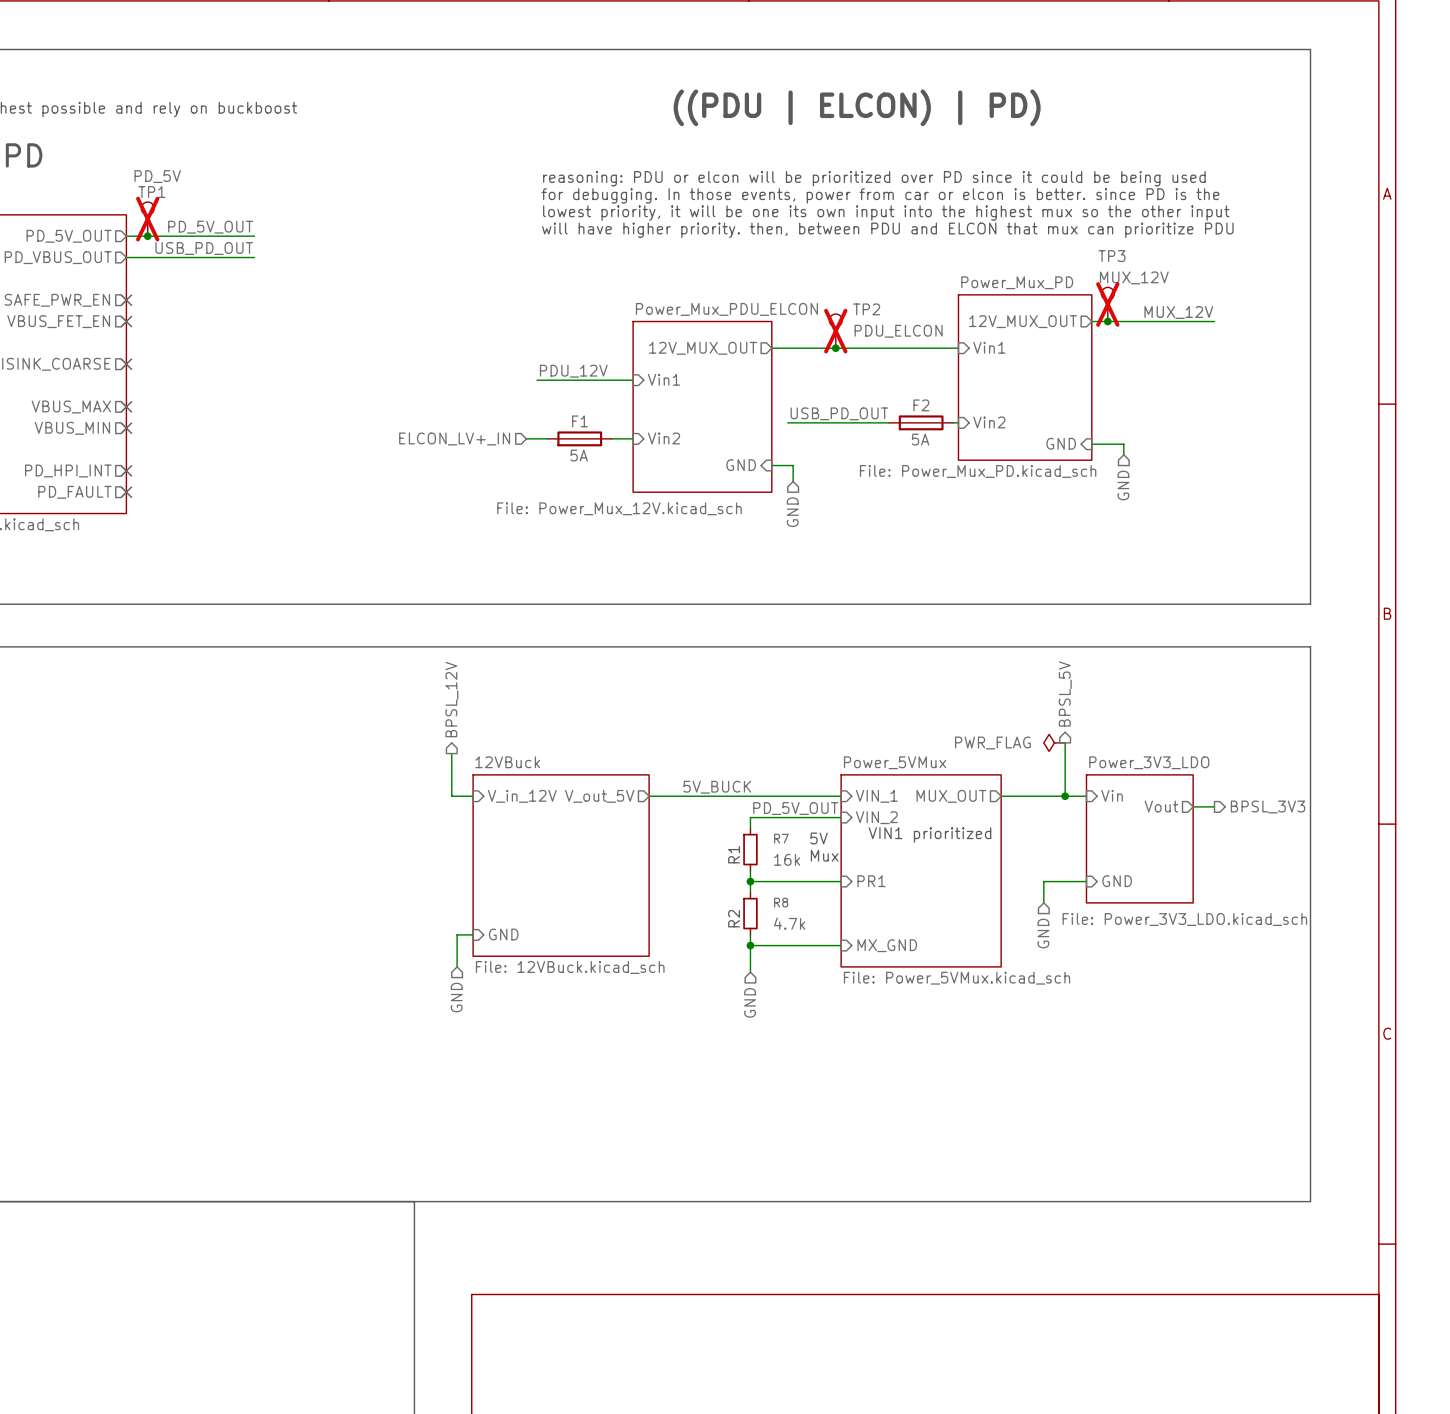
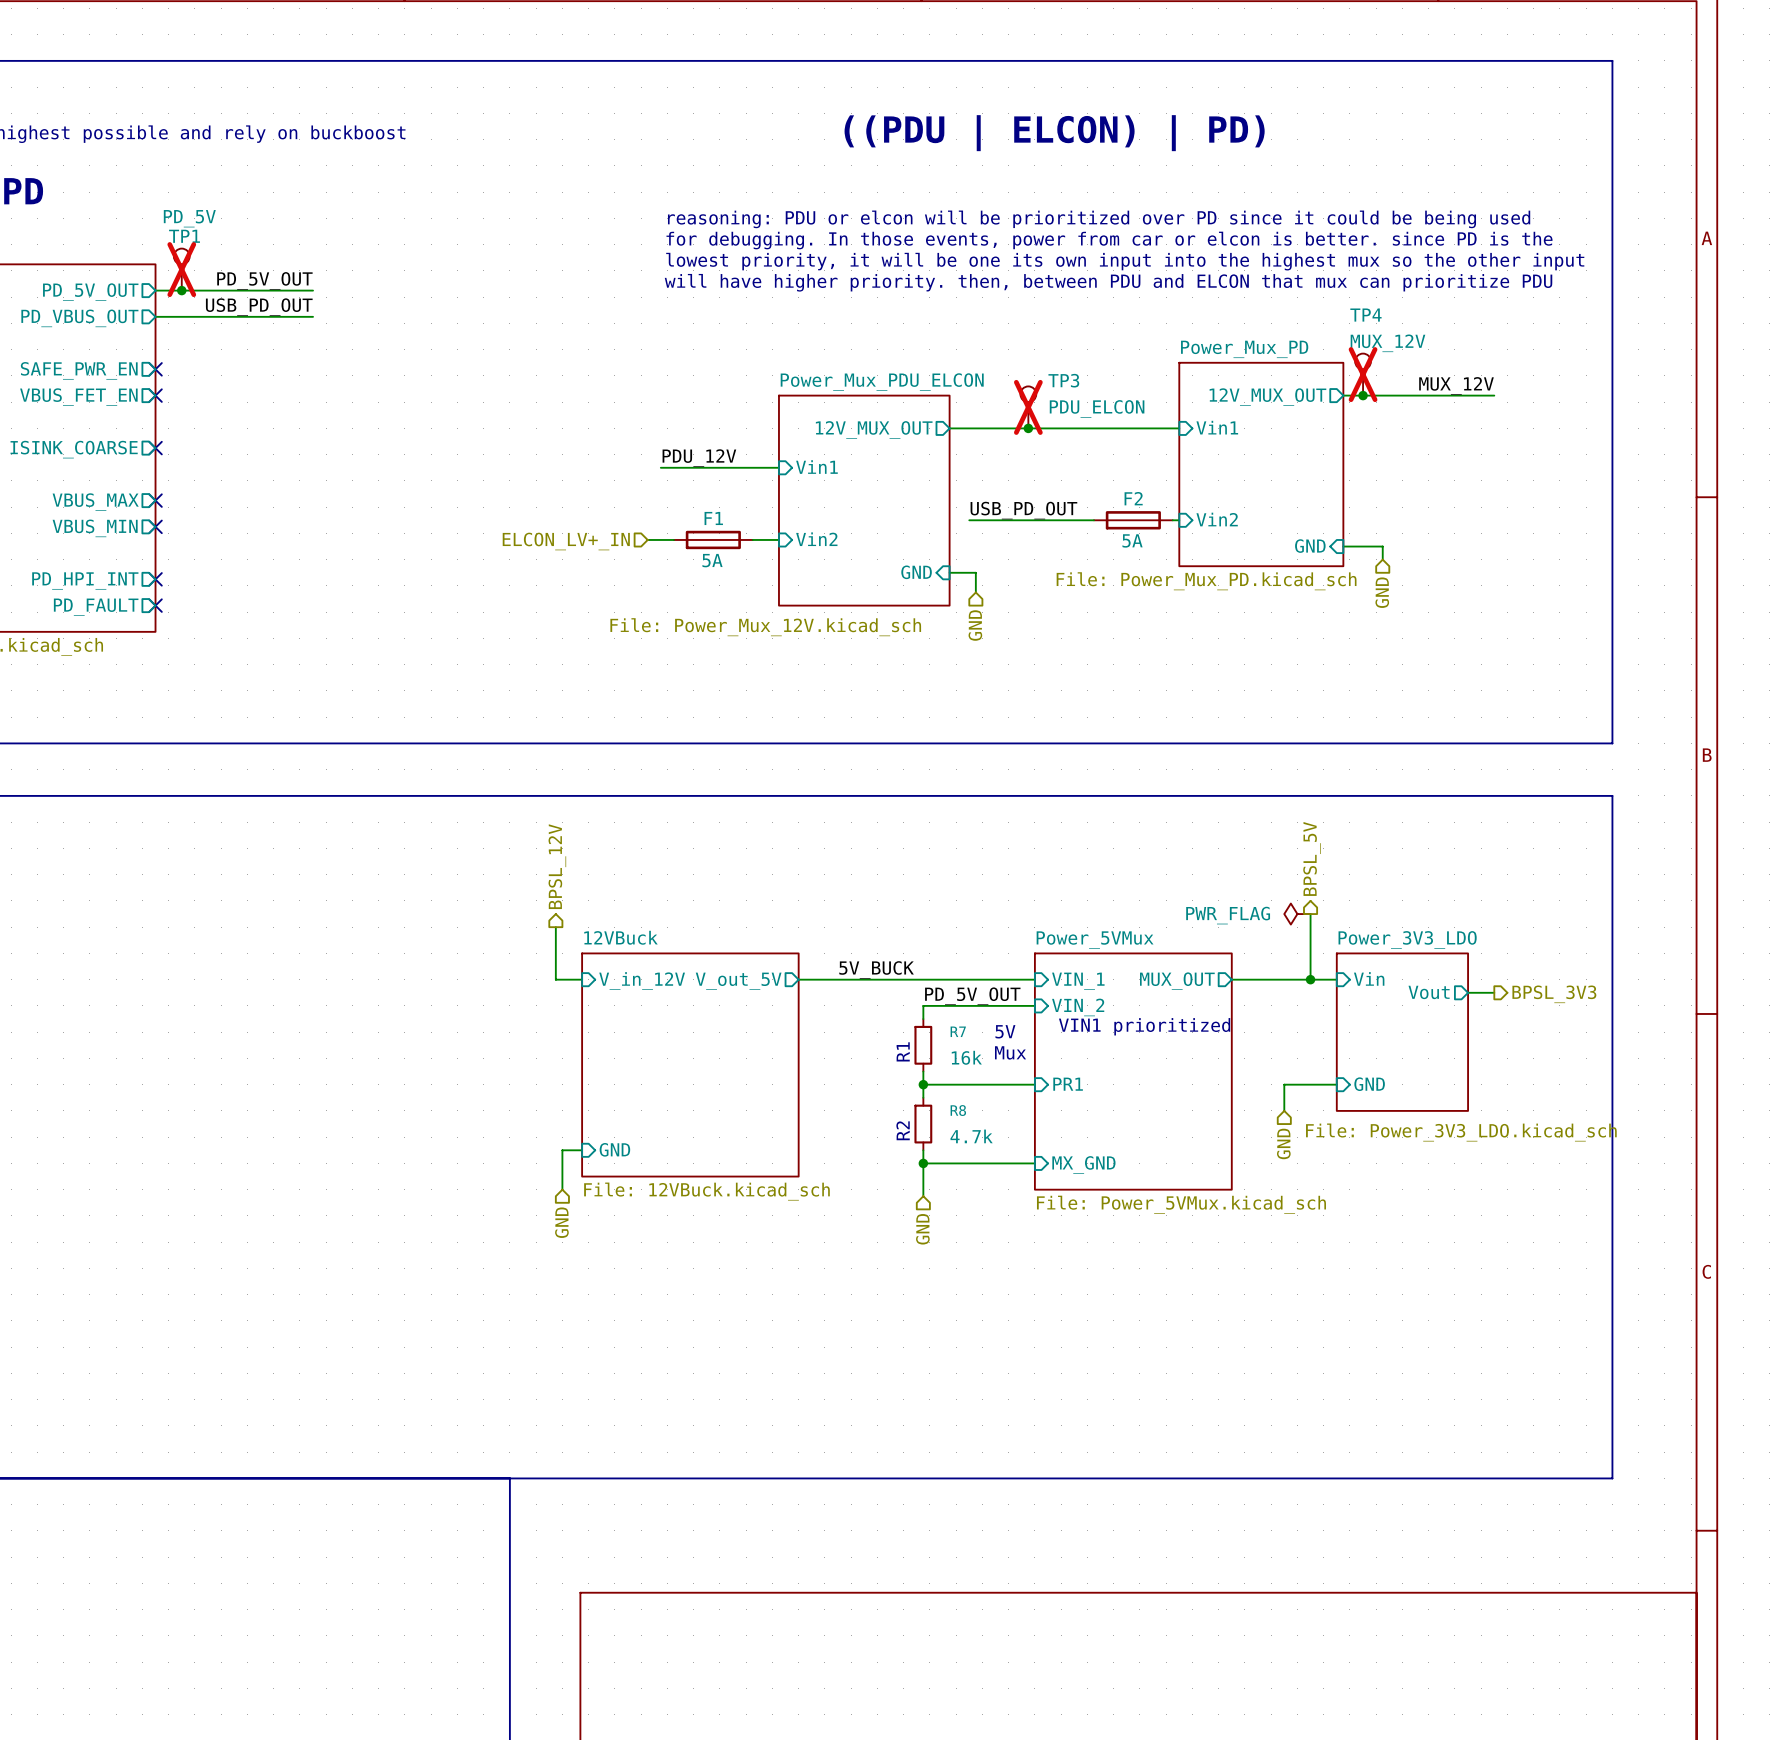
TP3 name: TP3 (1111, 256) -> TP4 (1365, 315)
TP2 name: TP2 (866, 309) -> TP3 (1063, 380)

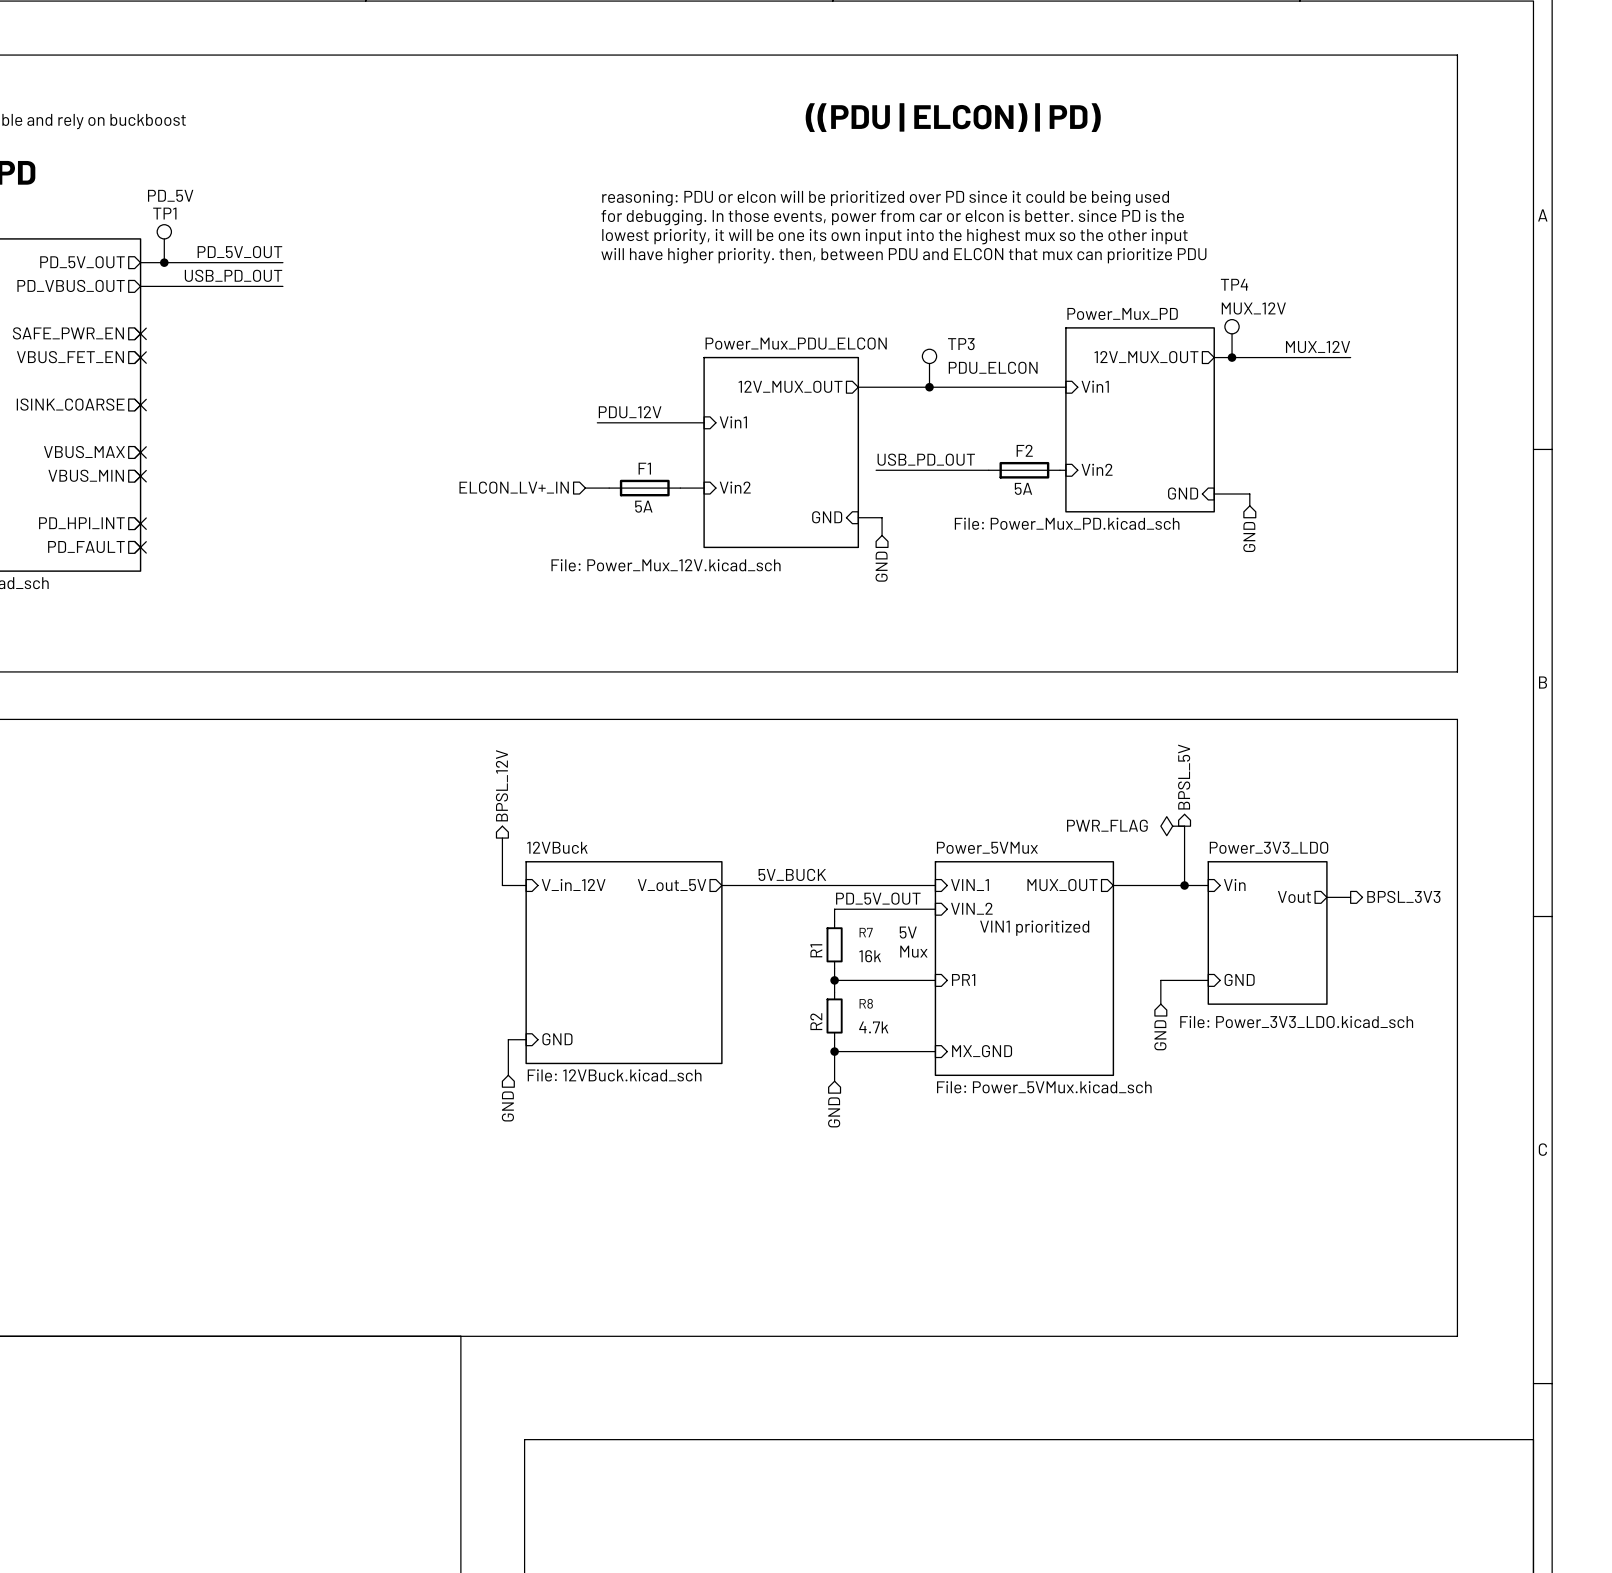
TP1 do-not-place cross: (181, 269) -> none
TP4 do-not-place cross: (1363, 374) -> none
TP3 do-not-place cross: (1028, 407) -> none

